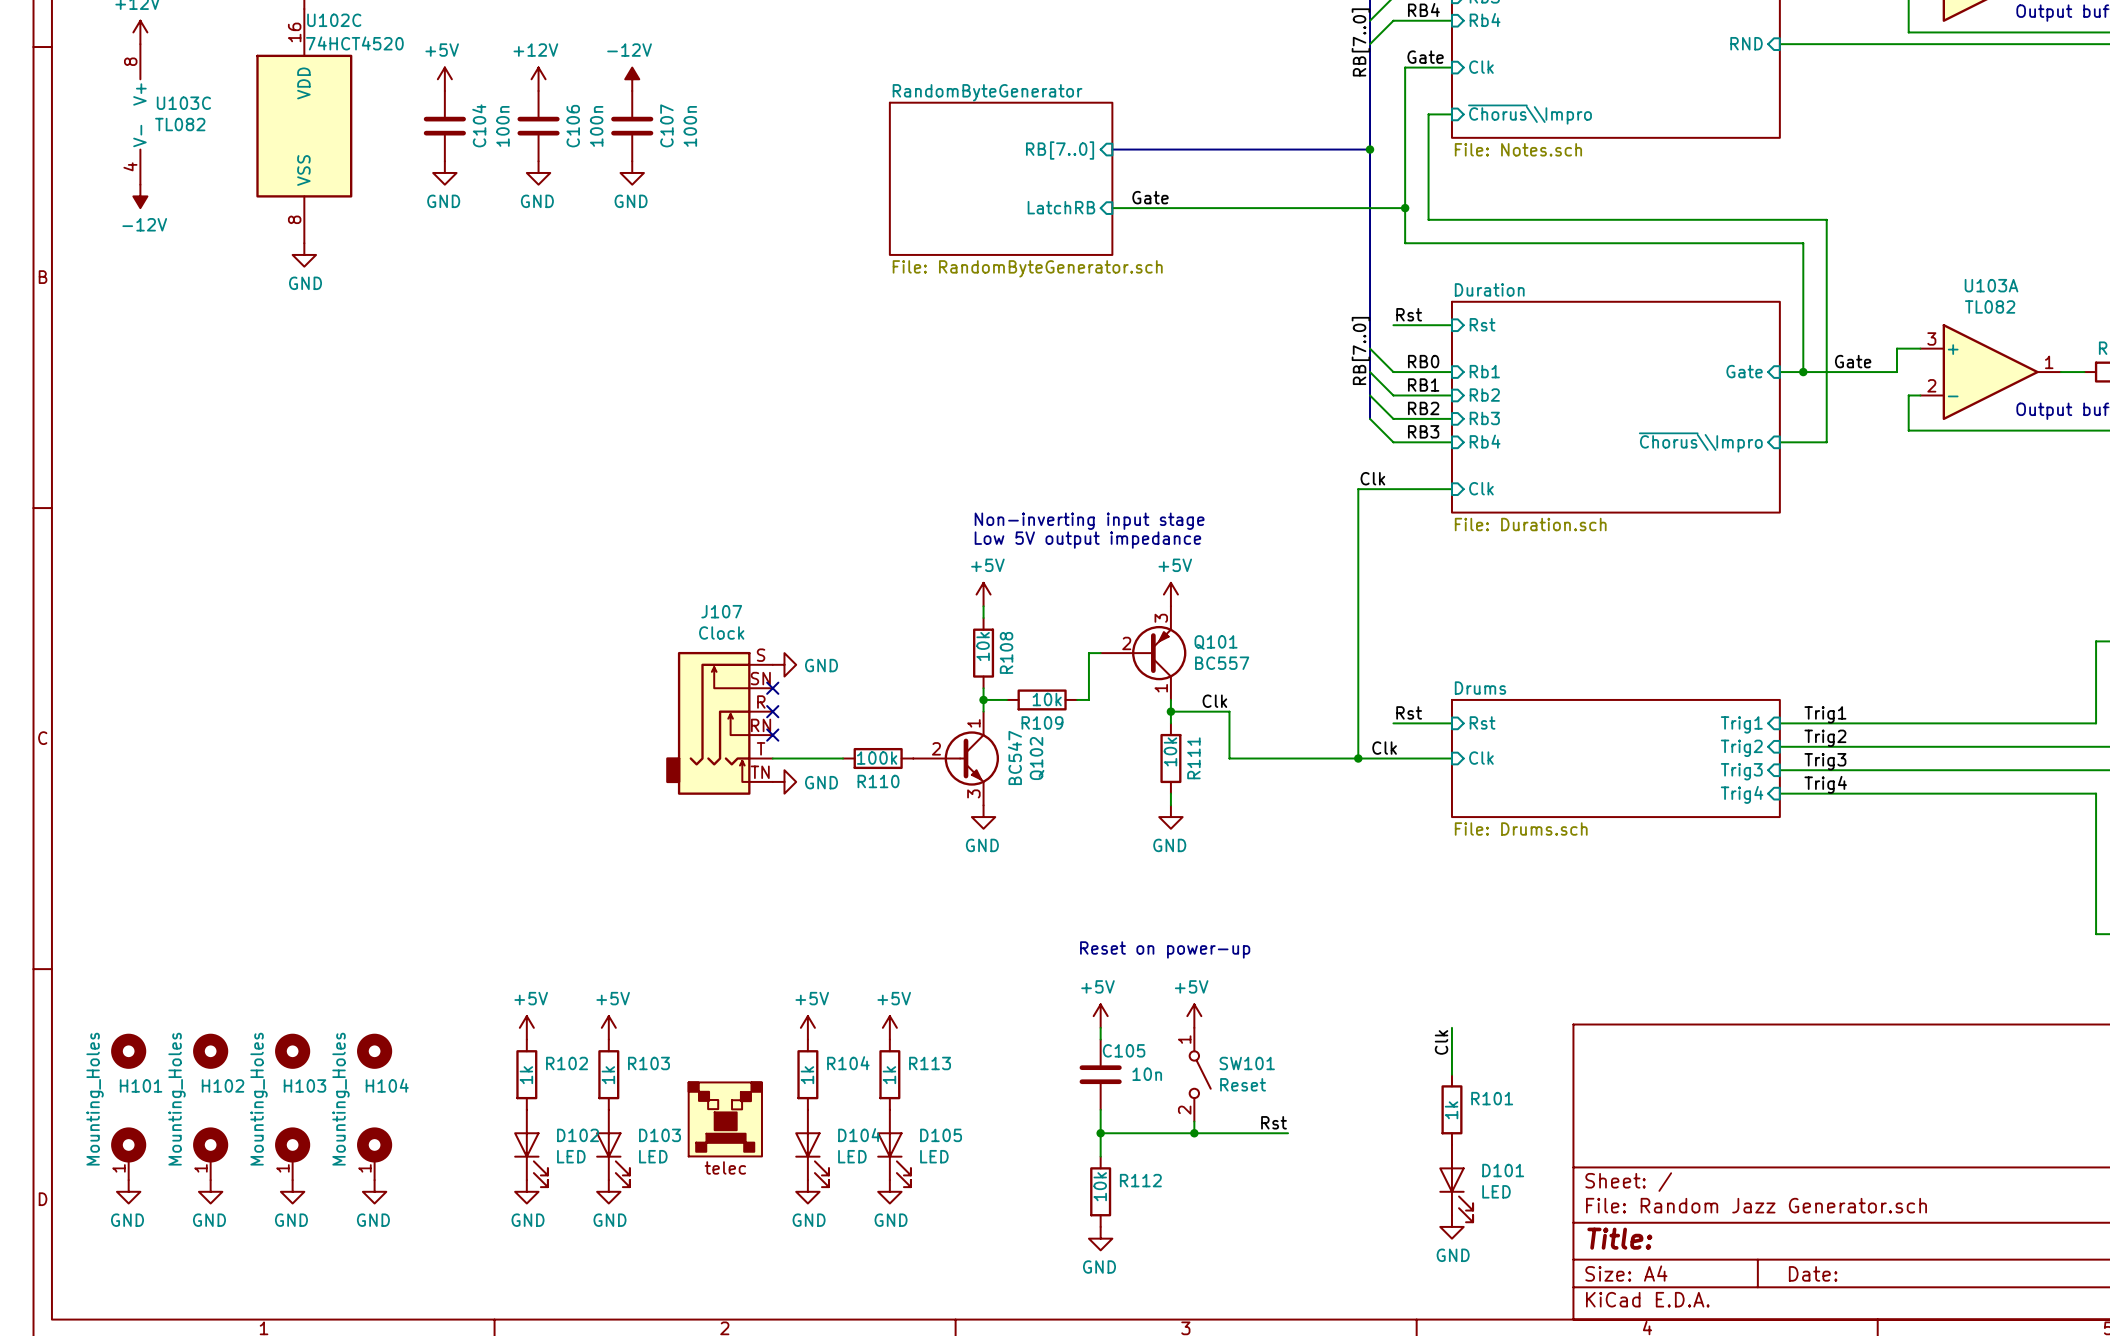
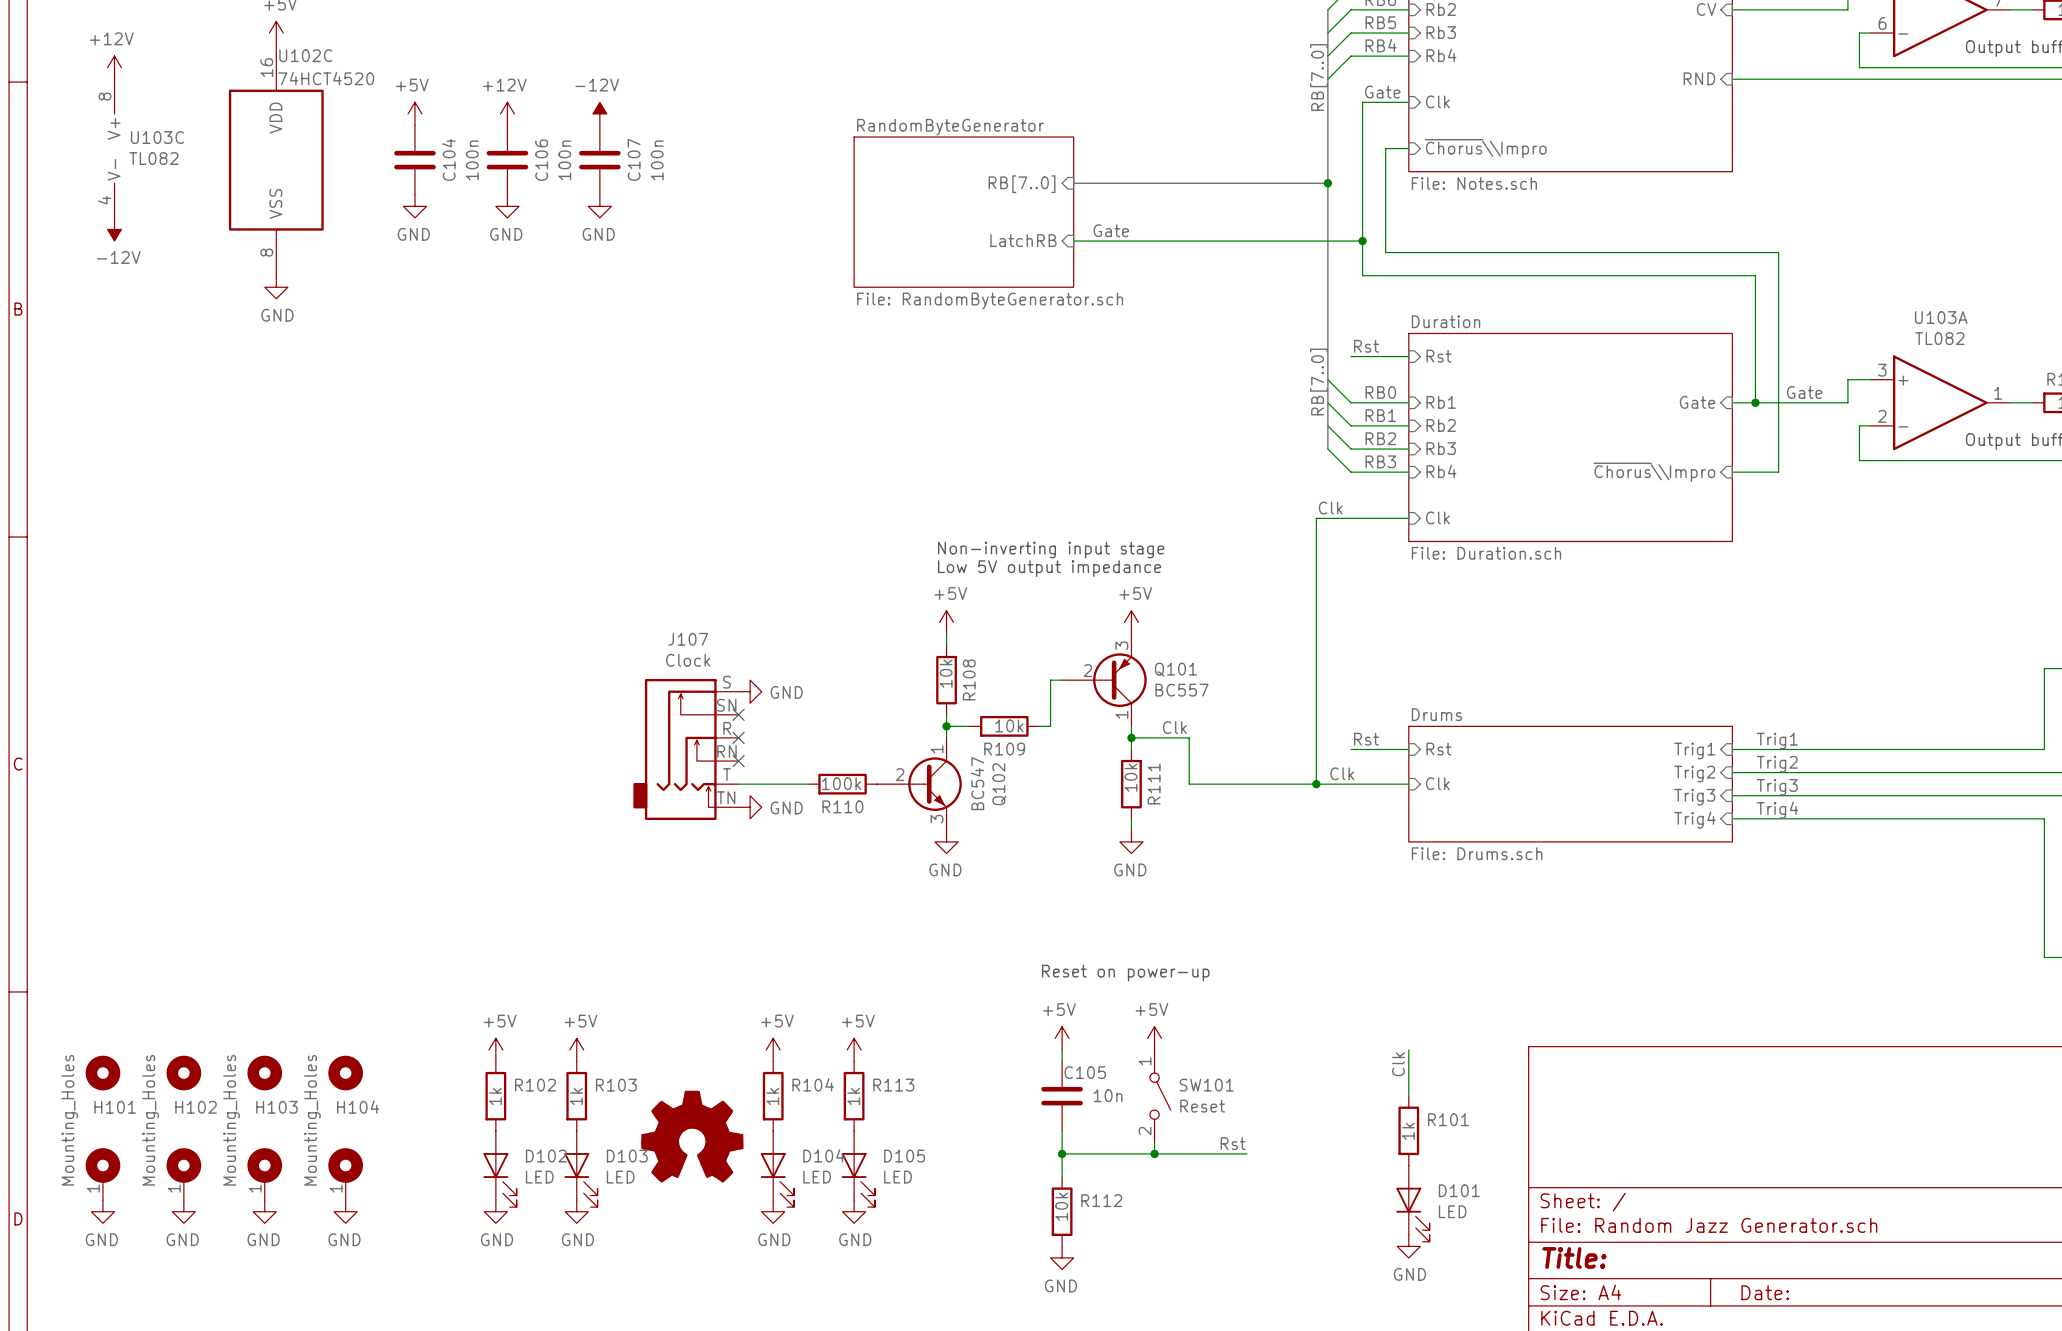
part symbol: [688, 1082, 762, 1157] -> [641, 1091, 743, 1182]

